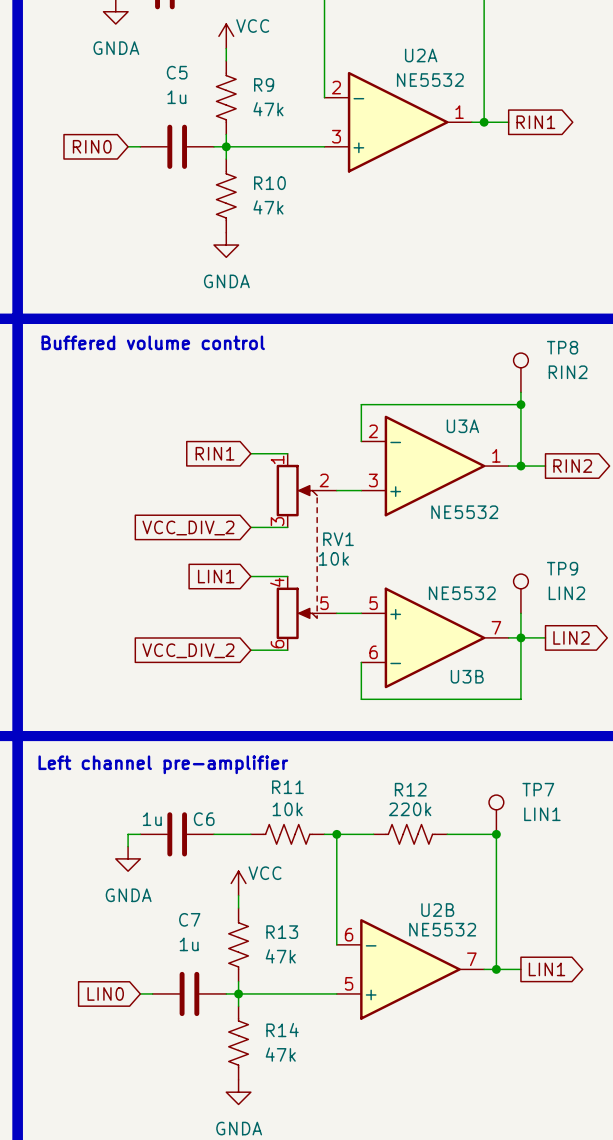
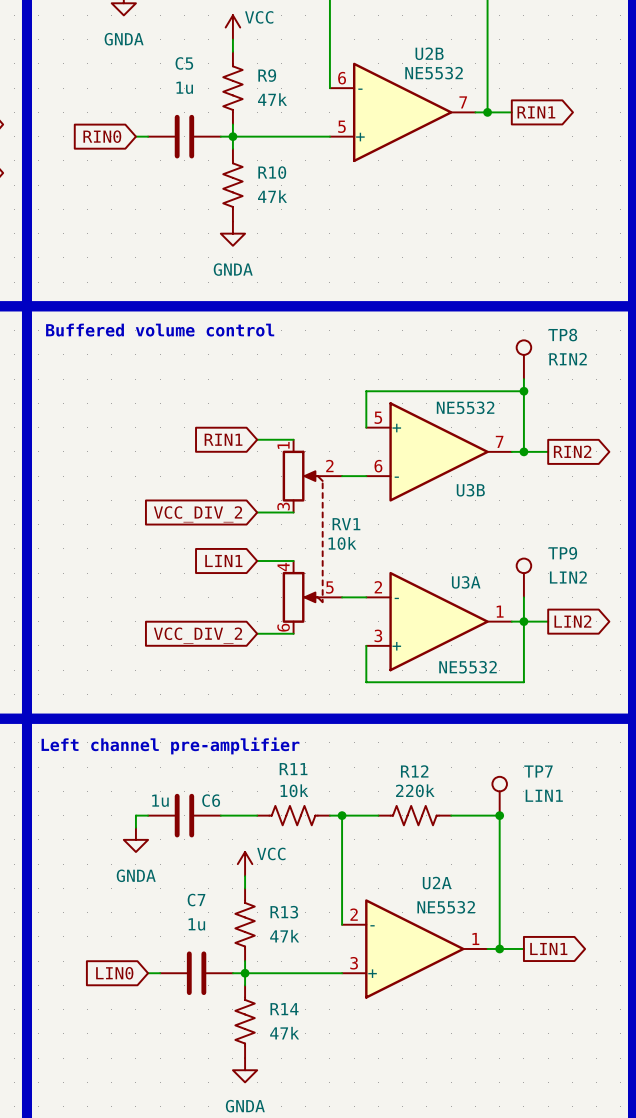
U2A position: (398, 122) -> (414, 948)
U3A position: (435, 466) -> (439, 621)
U3B position: (435, 637) -> (439, 451)
U2B position: (410, 969) -> (402, 112)

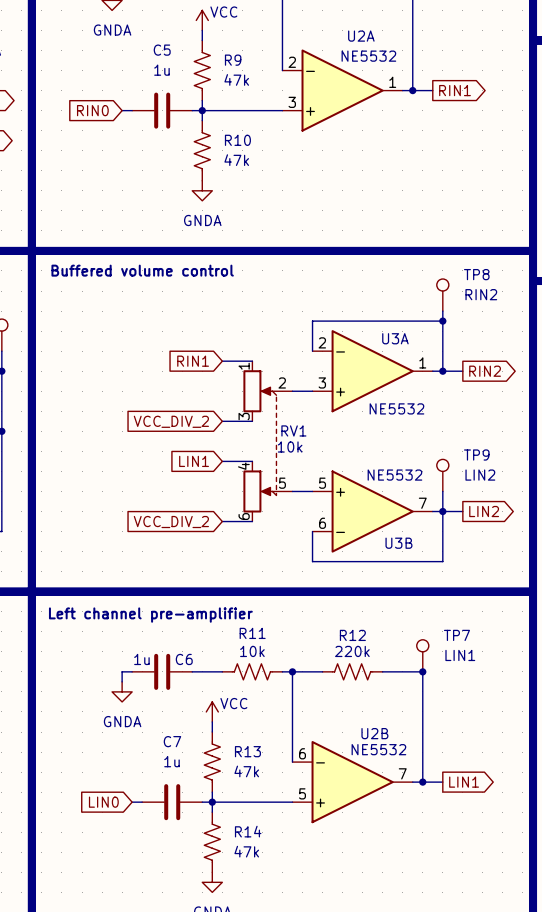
U2B position: (402, 112) -> (352, 782)
U3B position: (439, 451) -> (372, 511)
U3A position: (439, 621) -> (372, 371)
U2A position: (414, 948) -> (342, 90)

